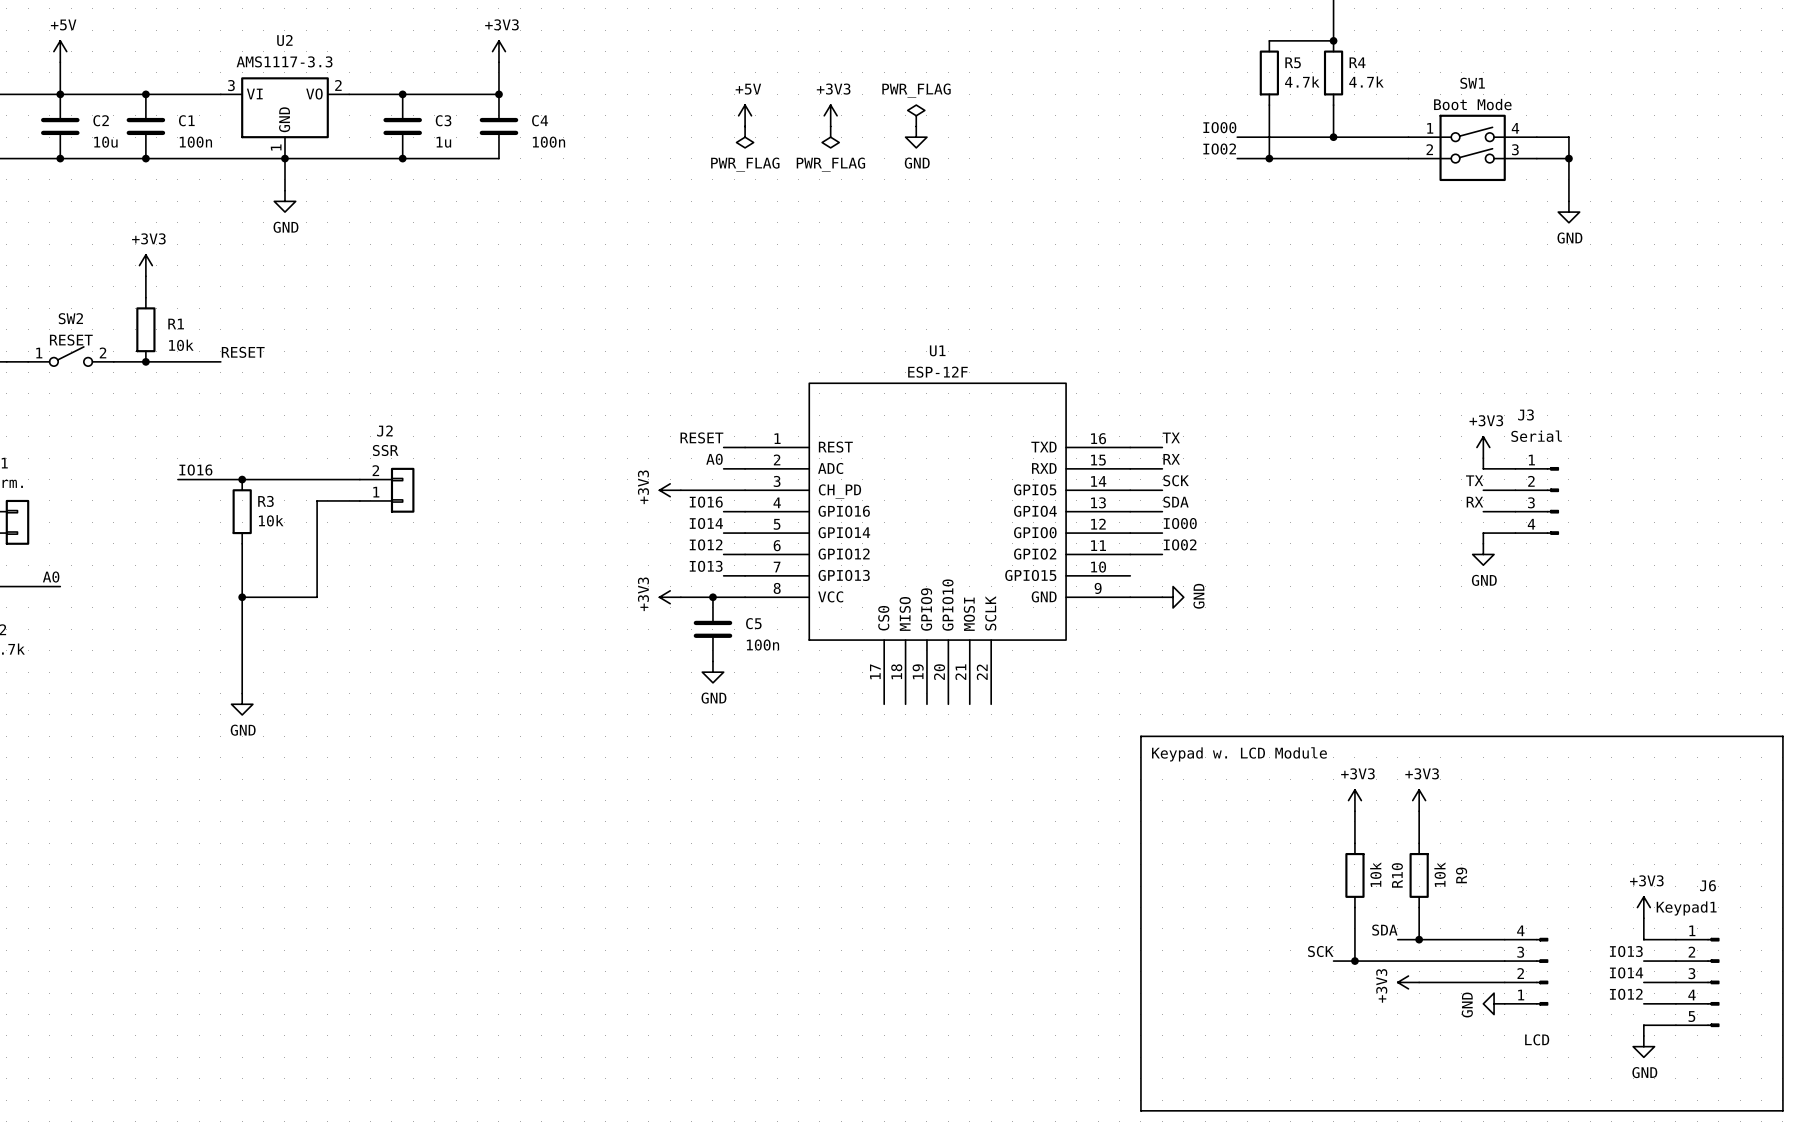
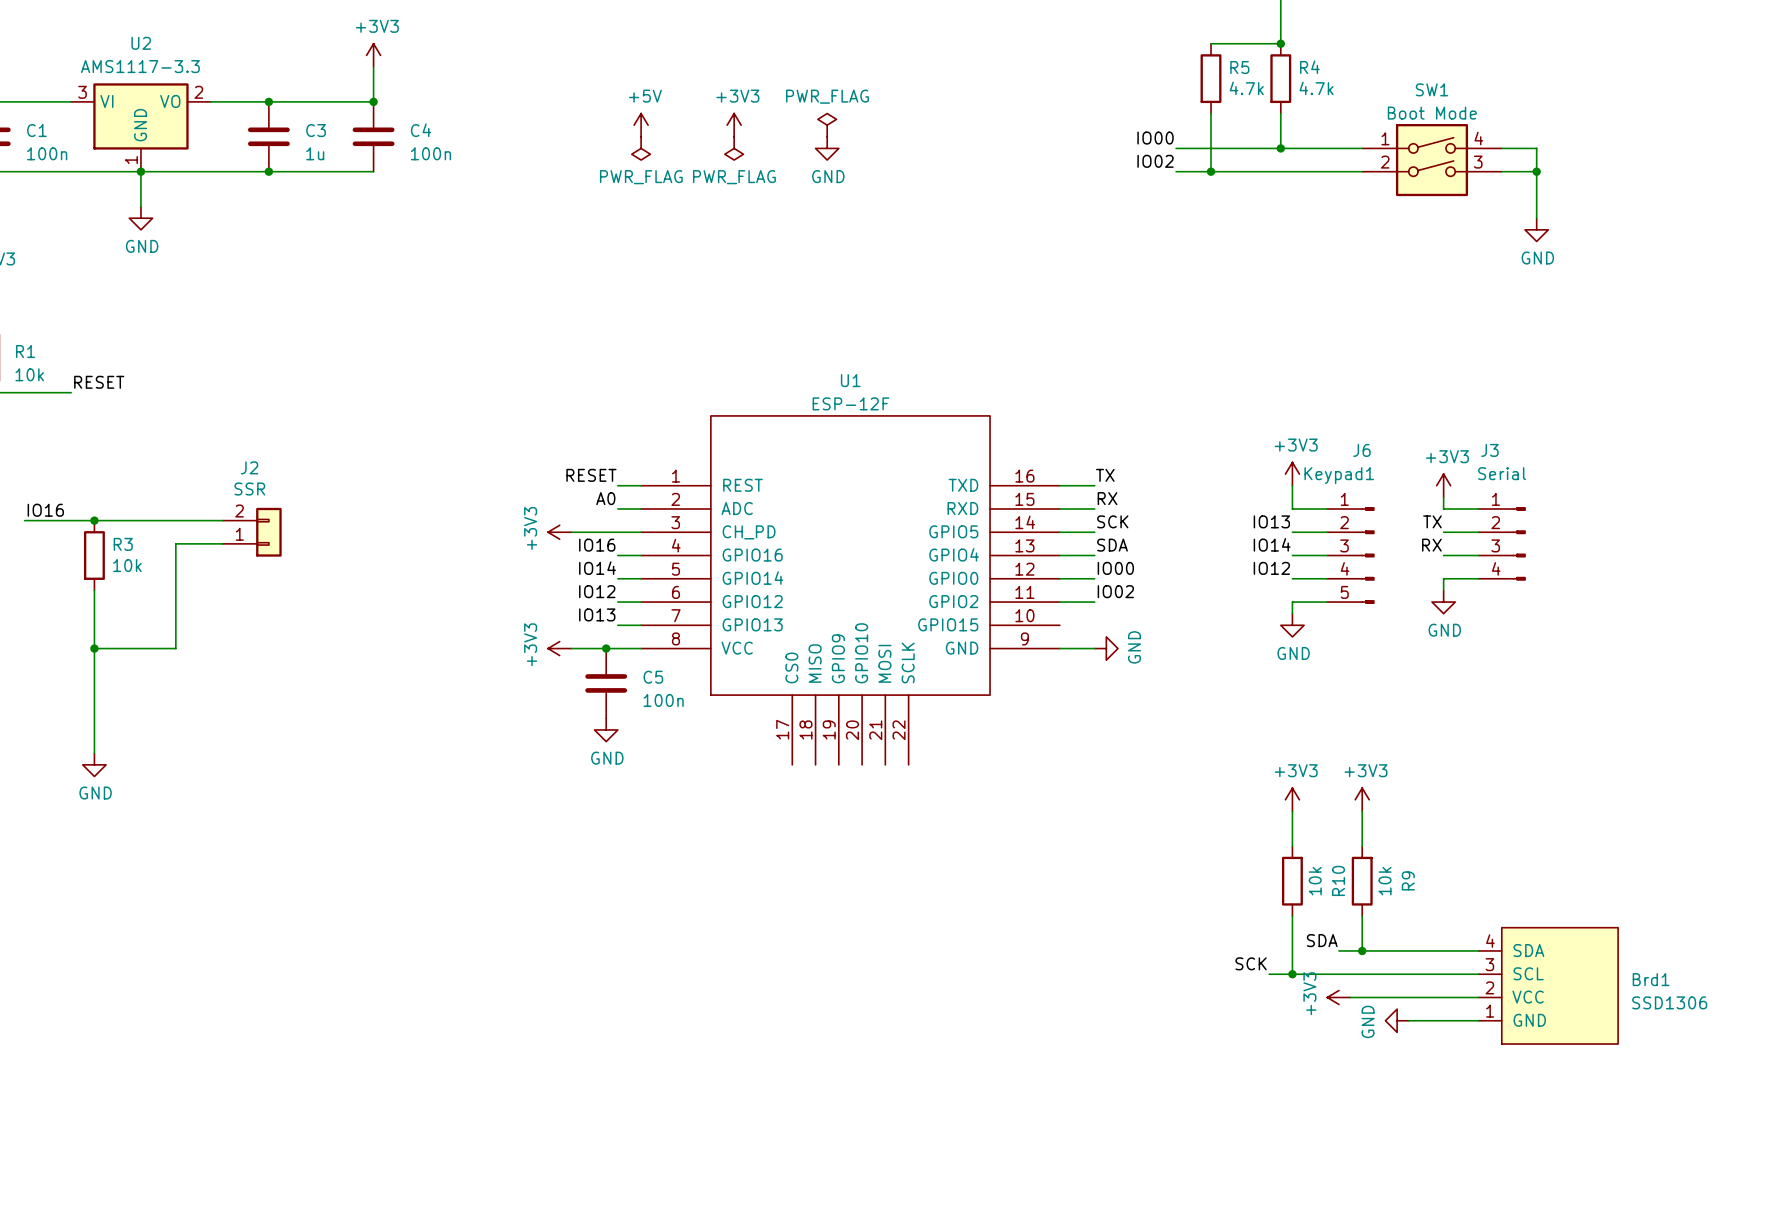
power symbol: none -> +3V3 (1292, 474)
wire: none -> (1292, 485) (1292, 508) (1327, 508)
label: none -> IO13 (1271, 521)
wire: none -> (1292, 532) (1327, 532)
label: none -> IO14 (1272, 544)
wire: none -> (1292, 555) (1327, 555)
label: none -> IO12 (1271, 568)
wire: none -> (1292, 578) (1327, 578)
wire: none -> (1327, 602) (1292, 602) (1292, 613)
power symbol: none -> GND (1292, 625)
line: (1140, 736) (1782, 736) (1782, 1110) (1140, 1110) (1140, 736) -> none
power symbol: none -> +3V3 (1292, 799)
power symbol: none -> +3V3 (1362, 799)
text: Keypad w. LCD Module (1239, 754) -> none
power symbol: +3V3 (1354, 800) -> none
power symbol: +3V3 (1419, 800) -> none
wire: (1354, 811) (1354, 843) -> (1292, 811) (1292, 846)
wire: (1419, 811) (1419, 843) -> (1362, 811) (1362, 846)
R10 position: (1354, 875) -> (1292, 881)
wire: none -> (1338, 950) (1478, 950)
junction: none -> (1362, 950)
R9 position: (1419, 875) -> (1362, 881)
wire: none -> (1269, 974) (1478, 974)
junction: none -> (1292, 974)
wire: (1354, 907) (1354, 961) -> (1292, 916) (1292, 974)
wire: (1419, 907) (1419, 939) -> (1362, 916) (1362, 950)
Brd1: none -> SSD1306 (1548, 985)
power symbol: +3V3 (1643, 907) -> none
power symbol: none -> +3V3 (1338, 997)
wire: none -> (1350, 997) (1478, 997)
wire: (1643, 918) (1643, 939) (1675, 939) -> none
label position: SDA (1384, 930) -> SDA (1322, 940)
wire: (1397, 939) (1451, 939) -> none
junction: (1419, 939) -> none
label position: SCK (1320, 951) -> SCK (1251, 963)
label: IO13 (1626, 951) -> none
wire: (1333, 961) (1504, 961) -> none
junction: (1354, 961) -> none
wire: (1643, 961) (1675, 961) -> none
part: LCD (1526, 971) -> none
label: IO14 (1626, 972) -> none
power symbol: +3V3 (1408, 982) -> none
wire: (1419, 982) (1504, 982) -> none
wire: (1643, 982) (1675, 982) -> none
J6 position: (1697, 982) -> (1350, 555)
label: IO12 (1626, 994) -> none
power symbol position: GND (1494, 1003) -> GND (1397, 1020)
wire: (1643, 1003) (1675, 1003) -> none
wire: (1675, 1025) (1643, 1025) (1643, 1035) -> none
power symbol: GND (1643, 1046) -> none

